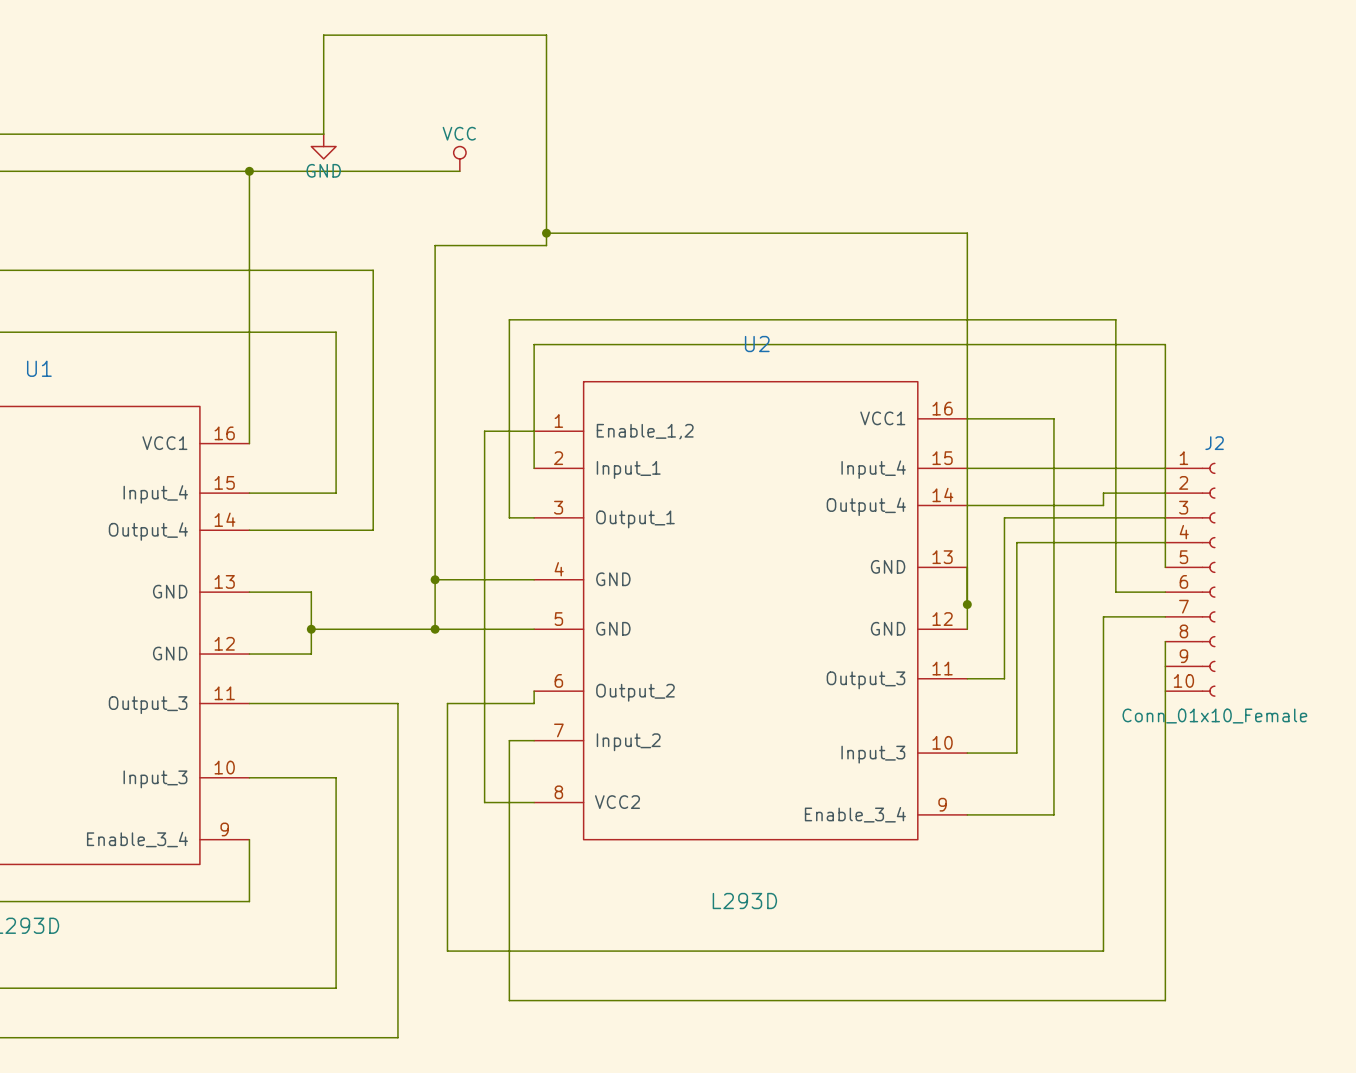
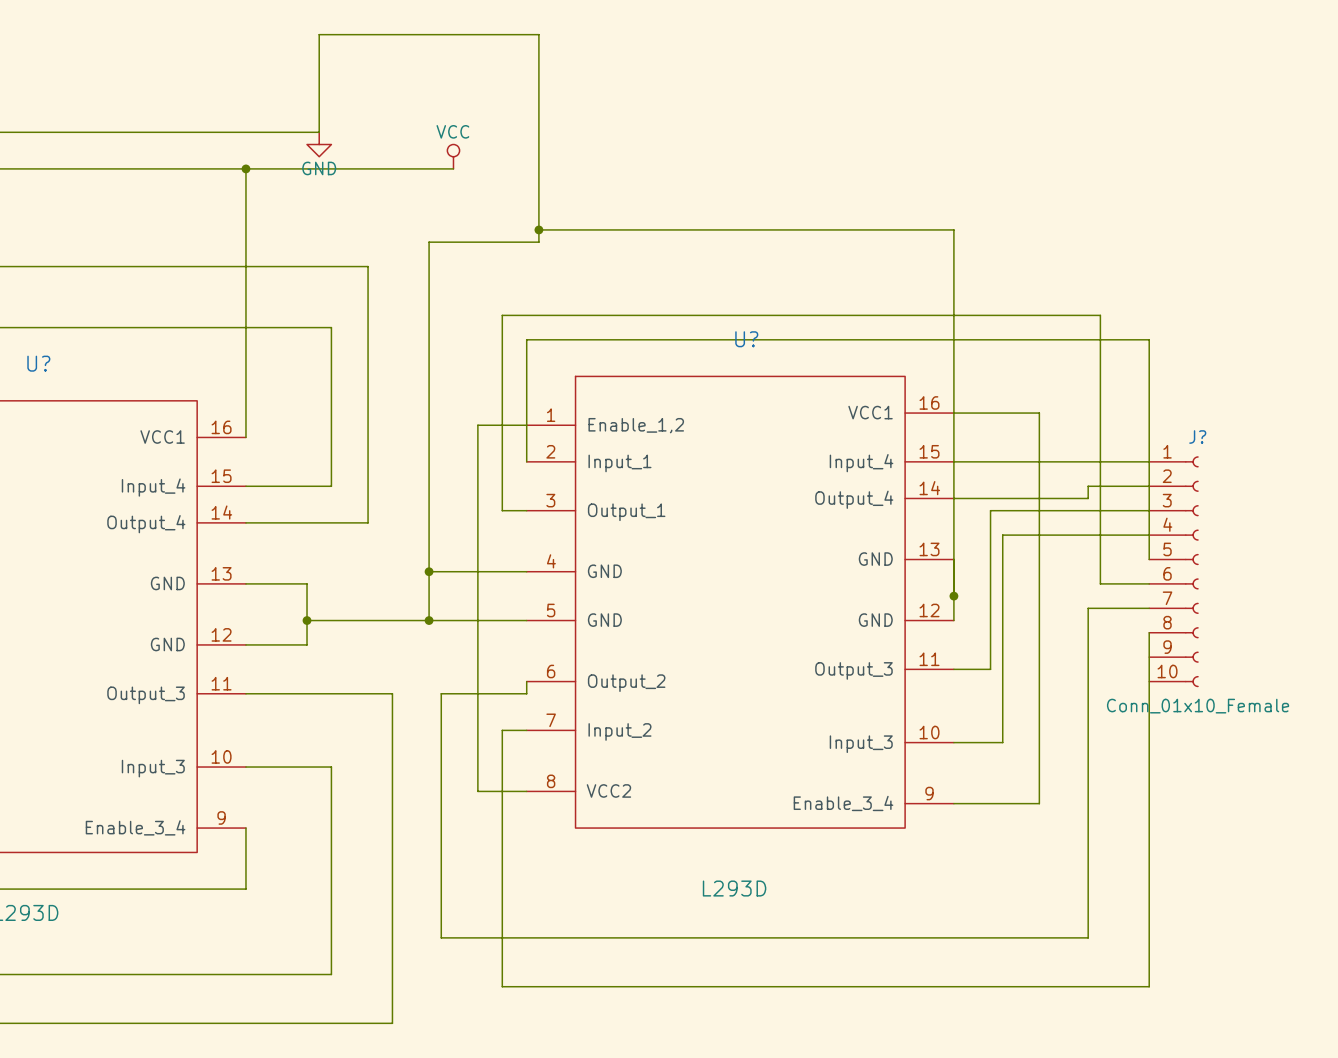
U2 name: U2 (757, 344) -> U? (746, 339)
U1 name: U1 (39, 368) -> U? (38, 363)
J2 name: J2 (1214, 443) -> J? (1197, 436)

